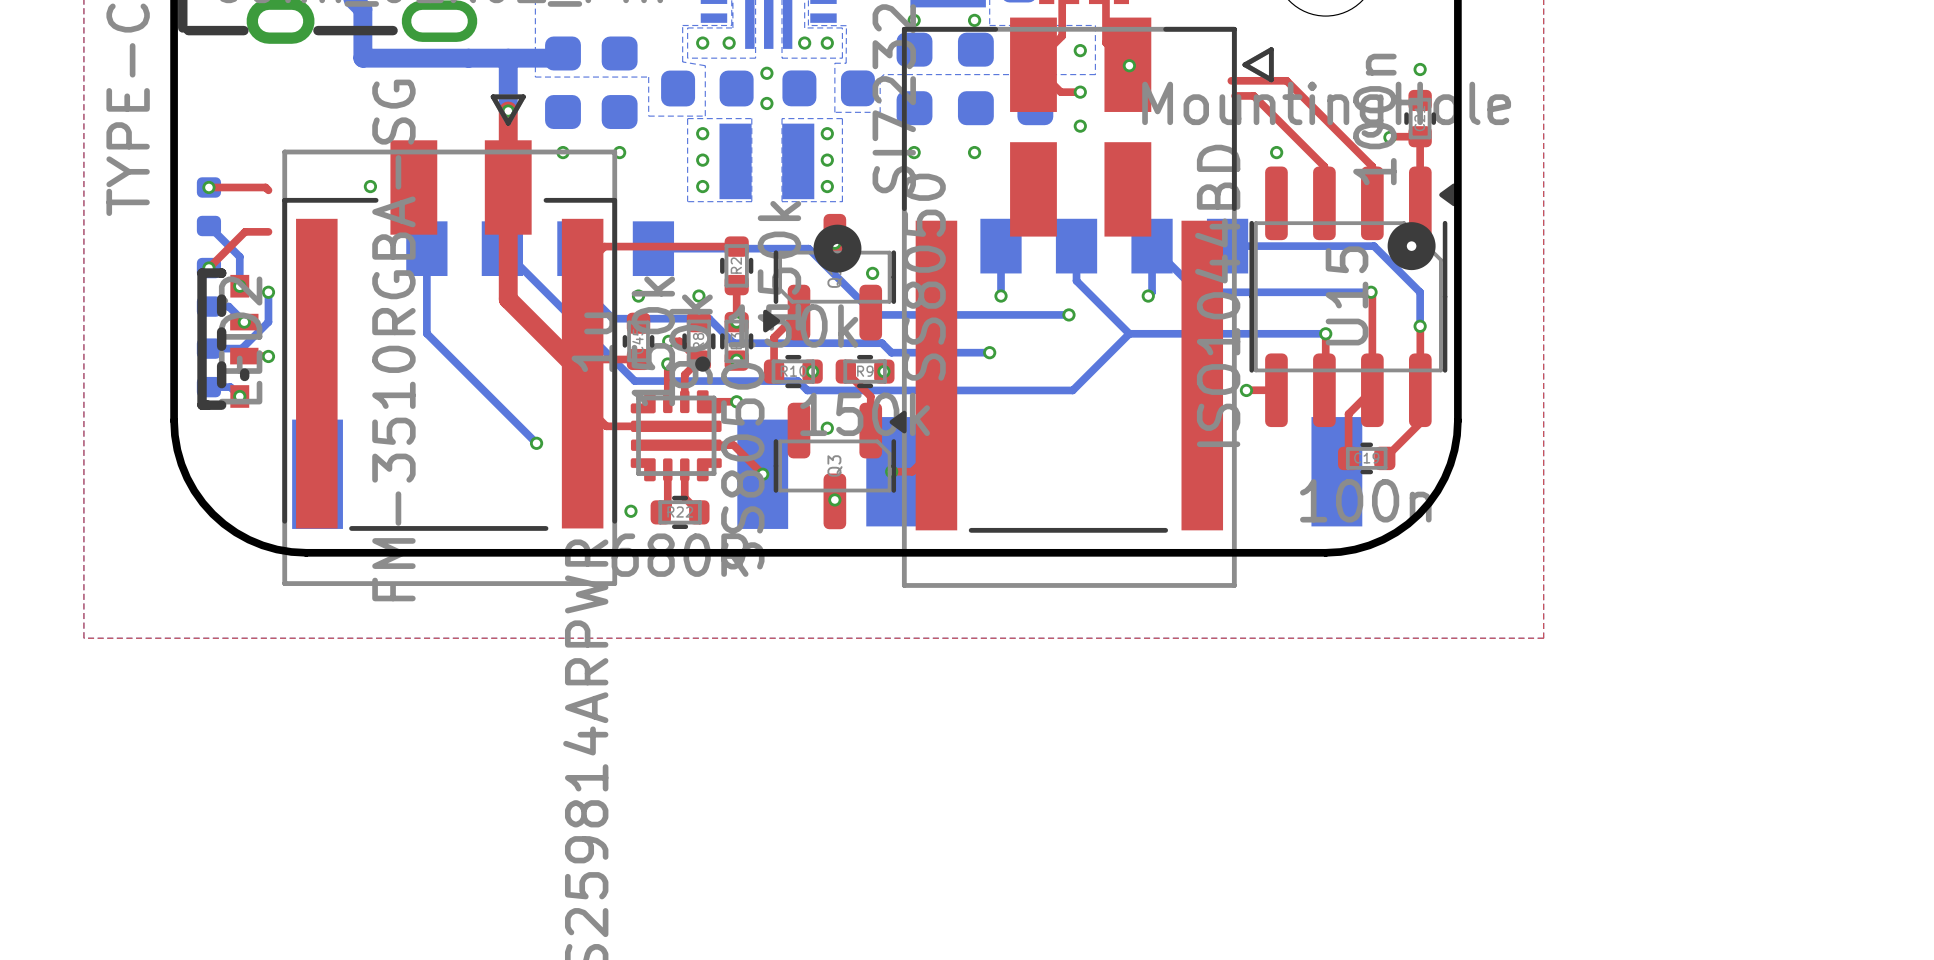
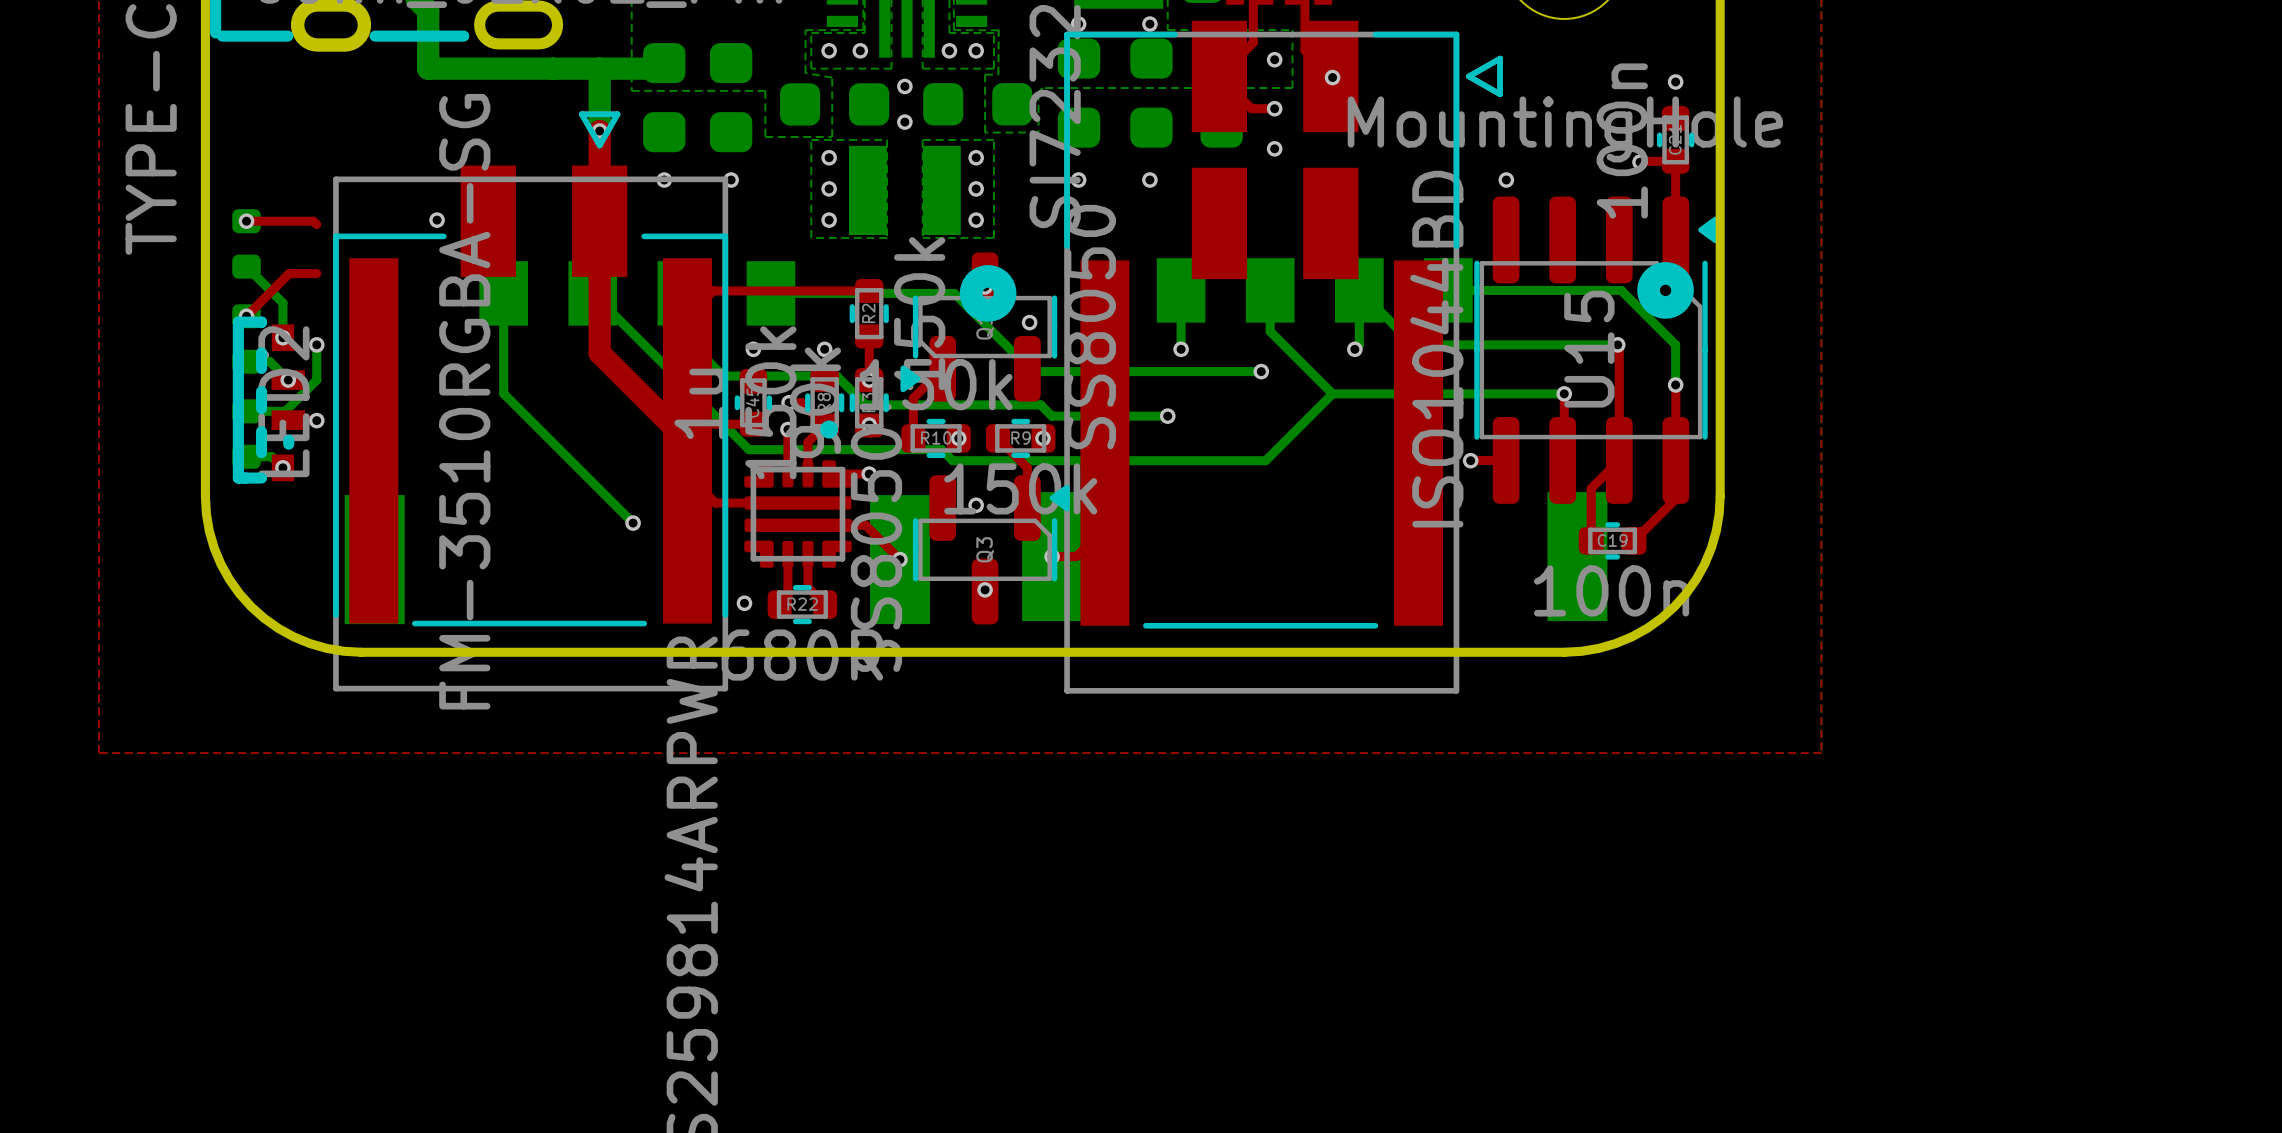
top track: (1231, 80) (1286, 80) (1372, 166) (1372, 203) -> none
top track: (1235, 95) (1253, 95) (1324, 166) (1324, 203) -> none

